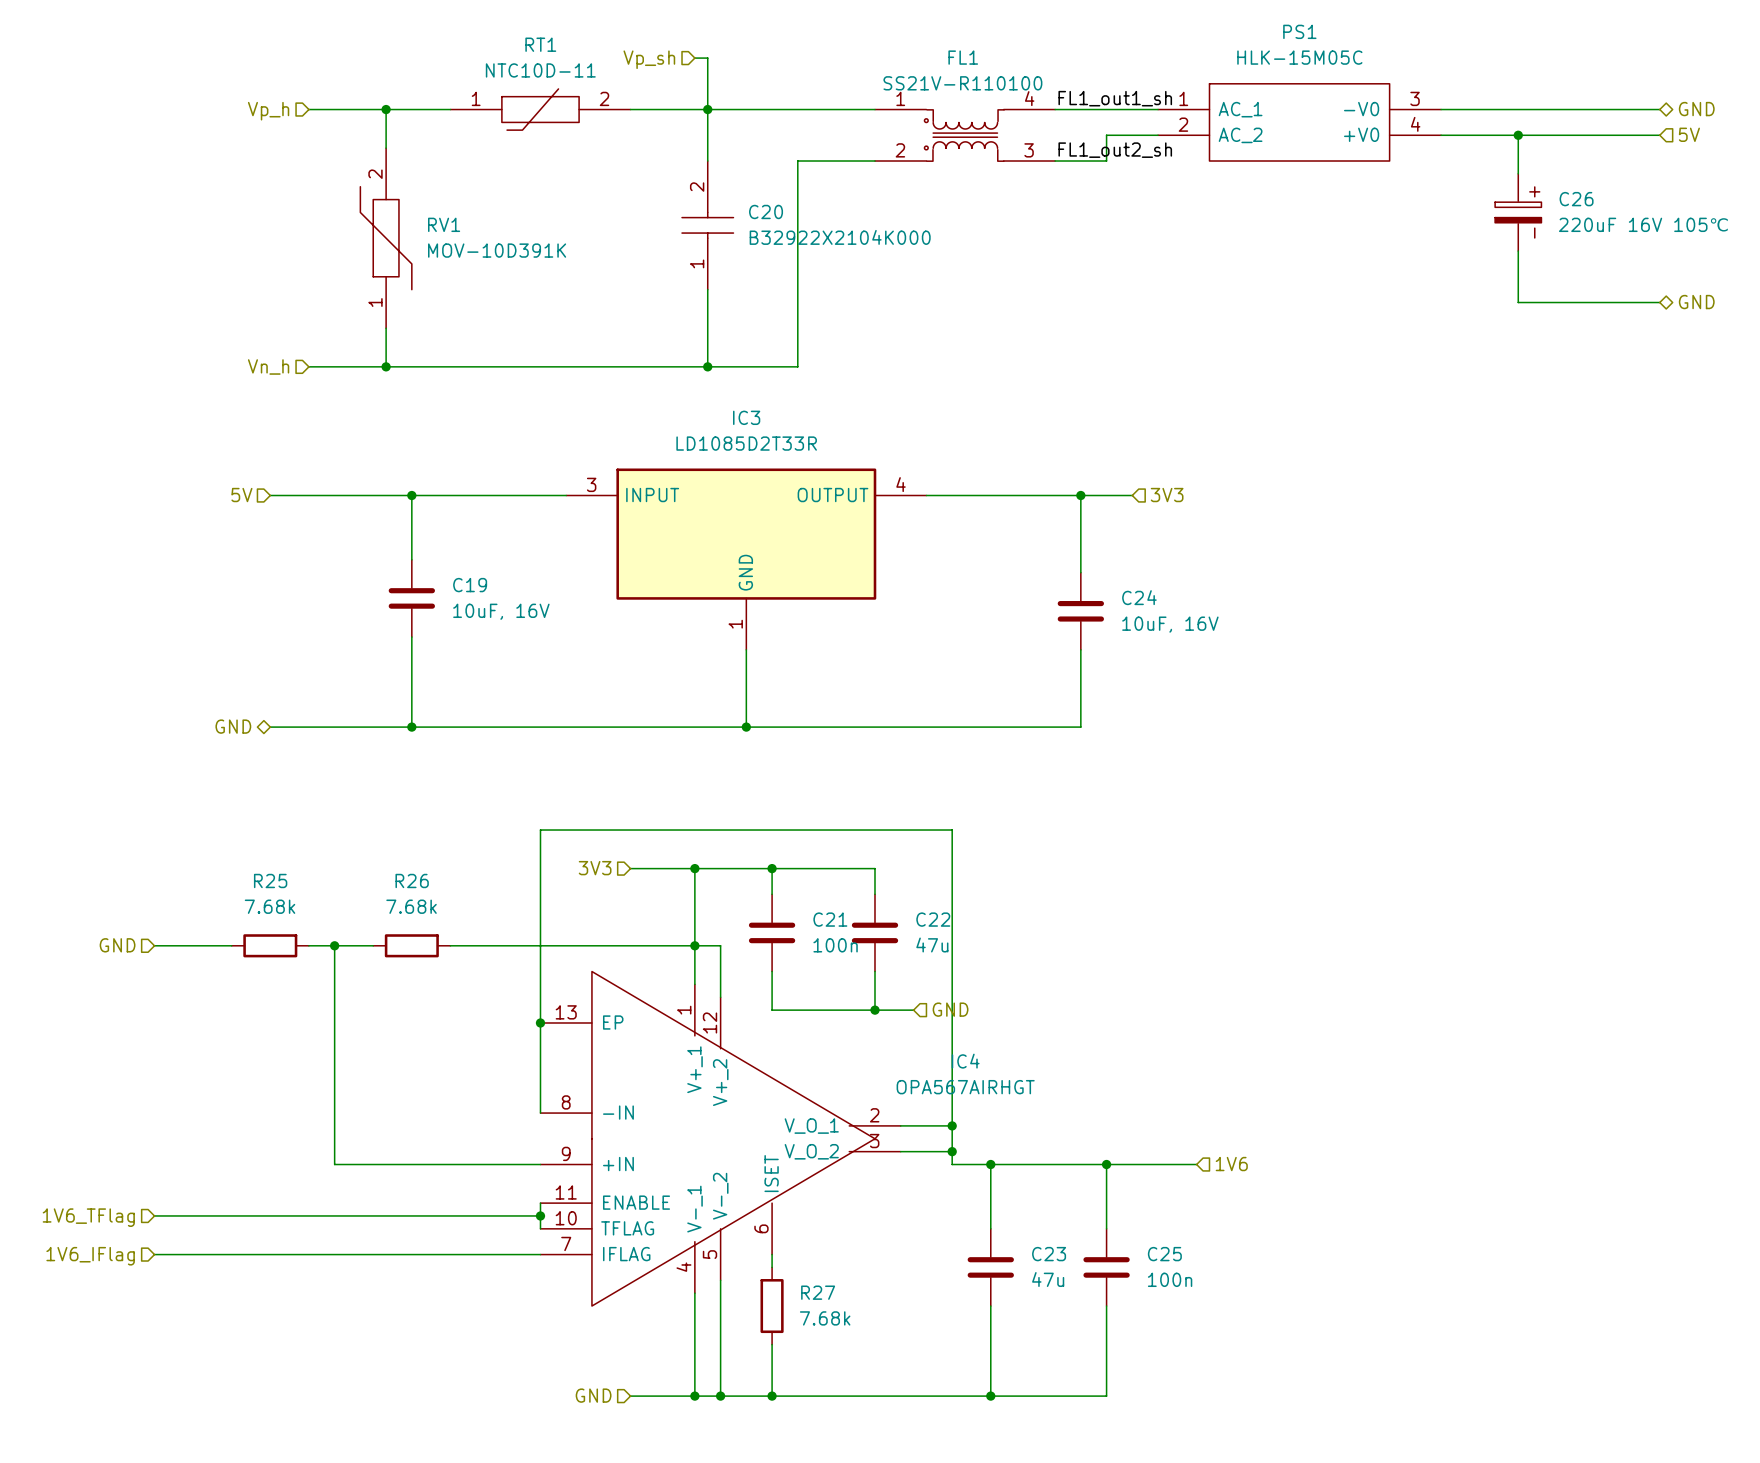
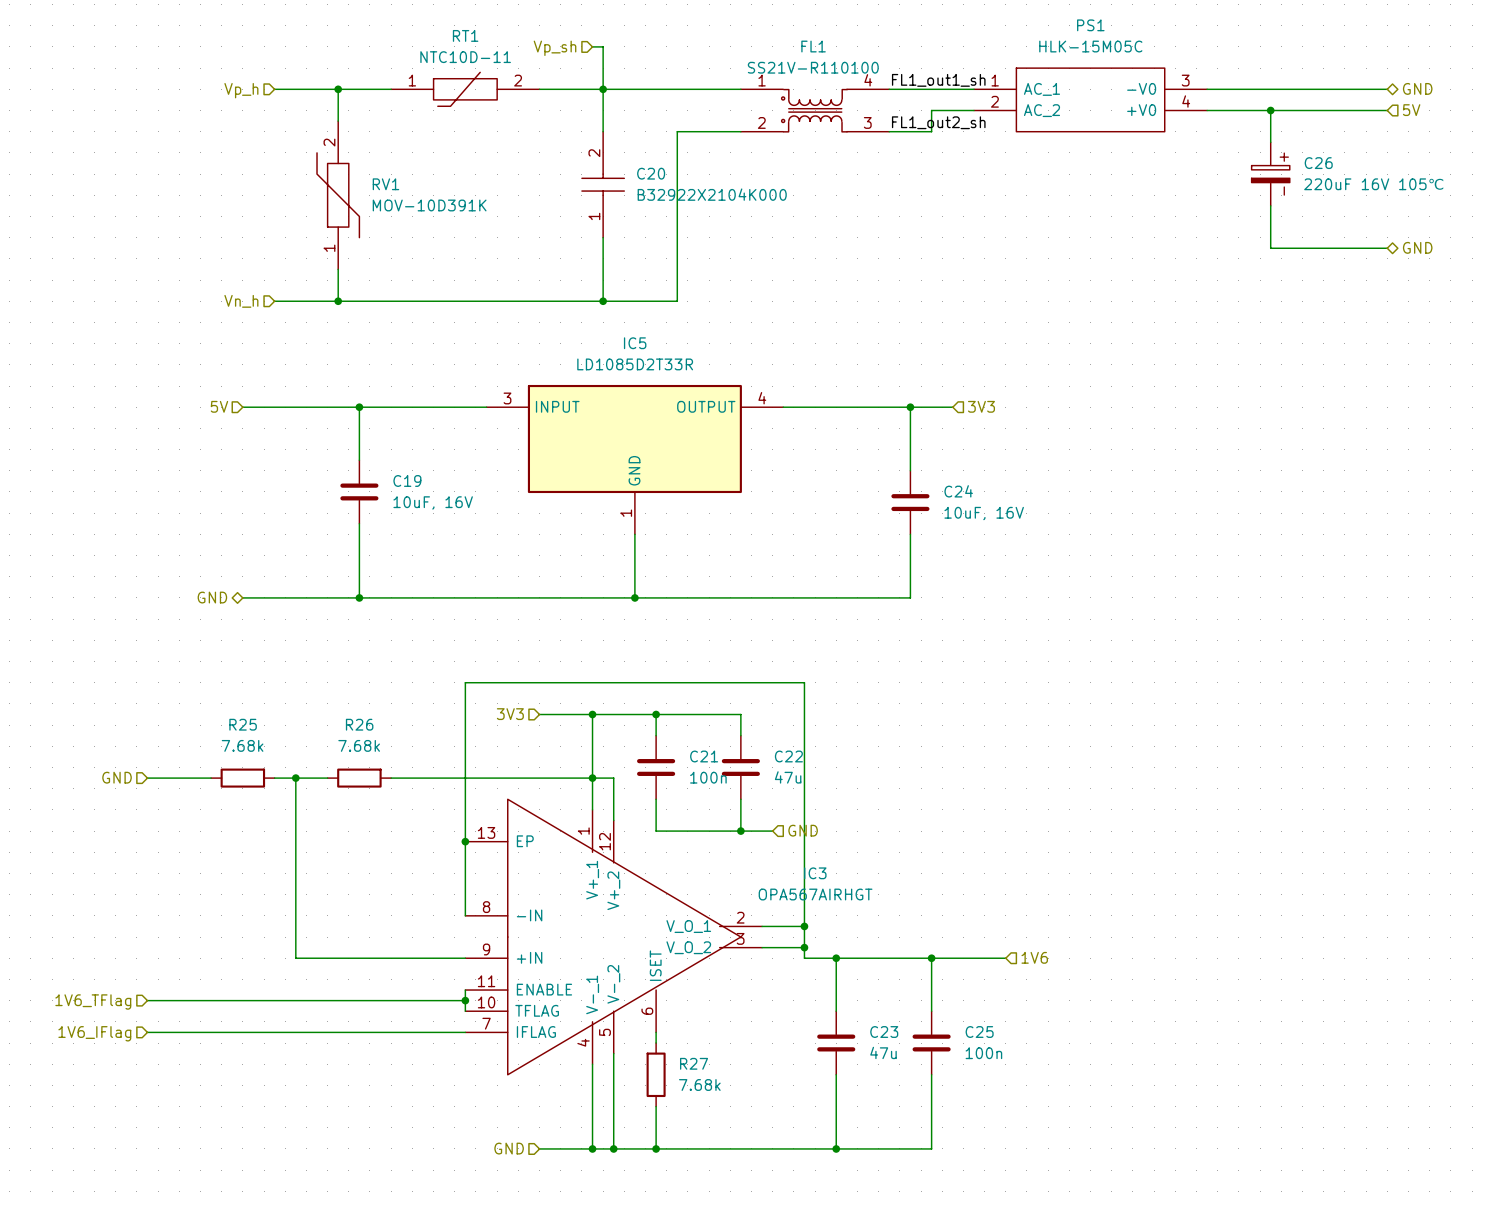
IC3 name: IC3 (746, 417) -> IC5 (635, 343)
IC4 name: IC4 (965, 1061) -> IC3 (815, 873)

